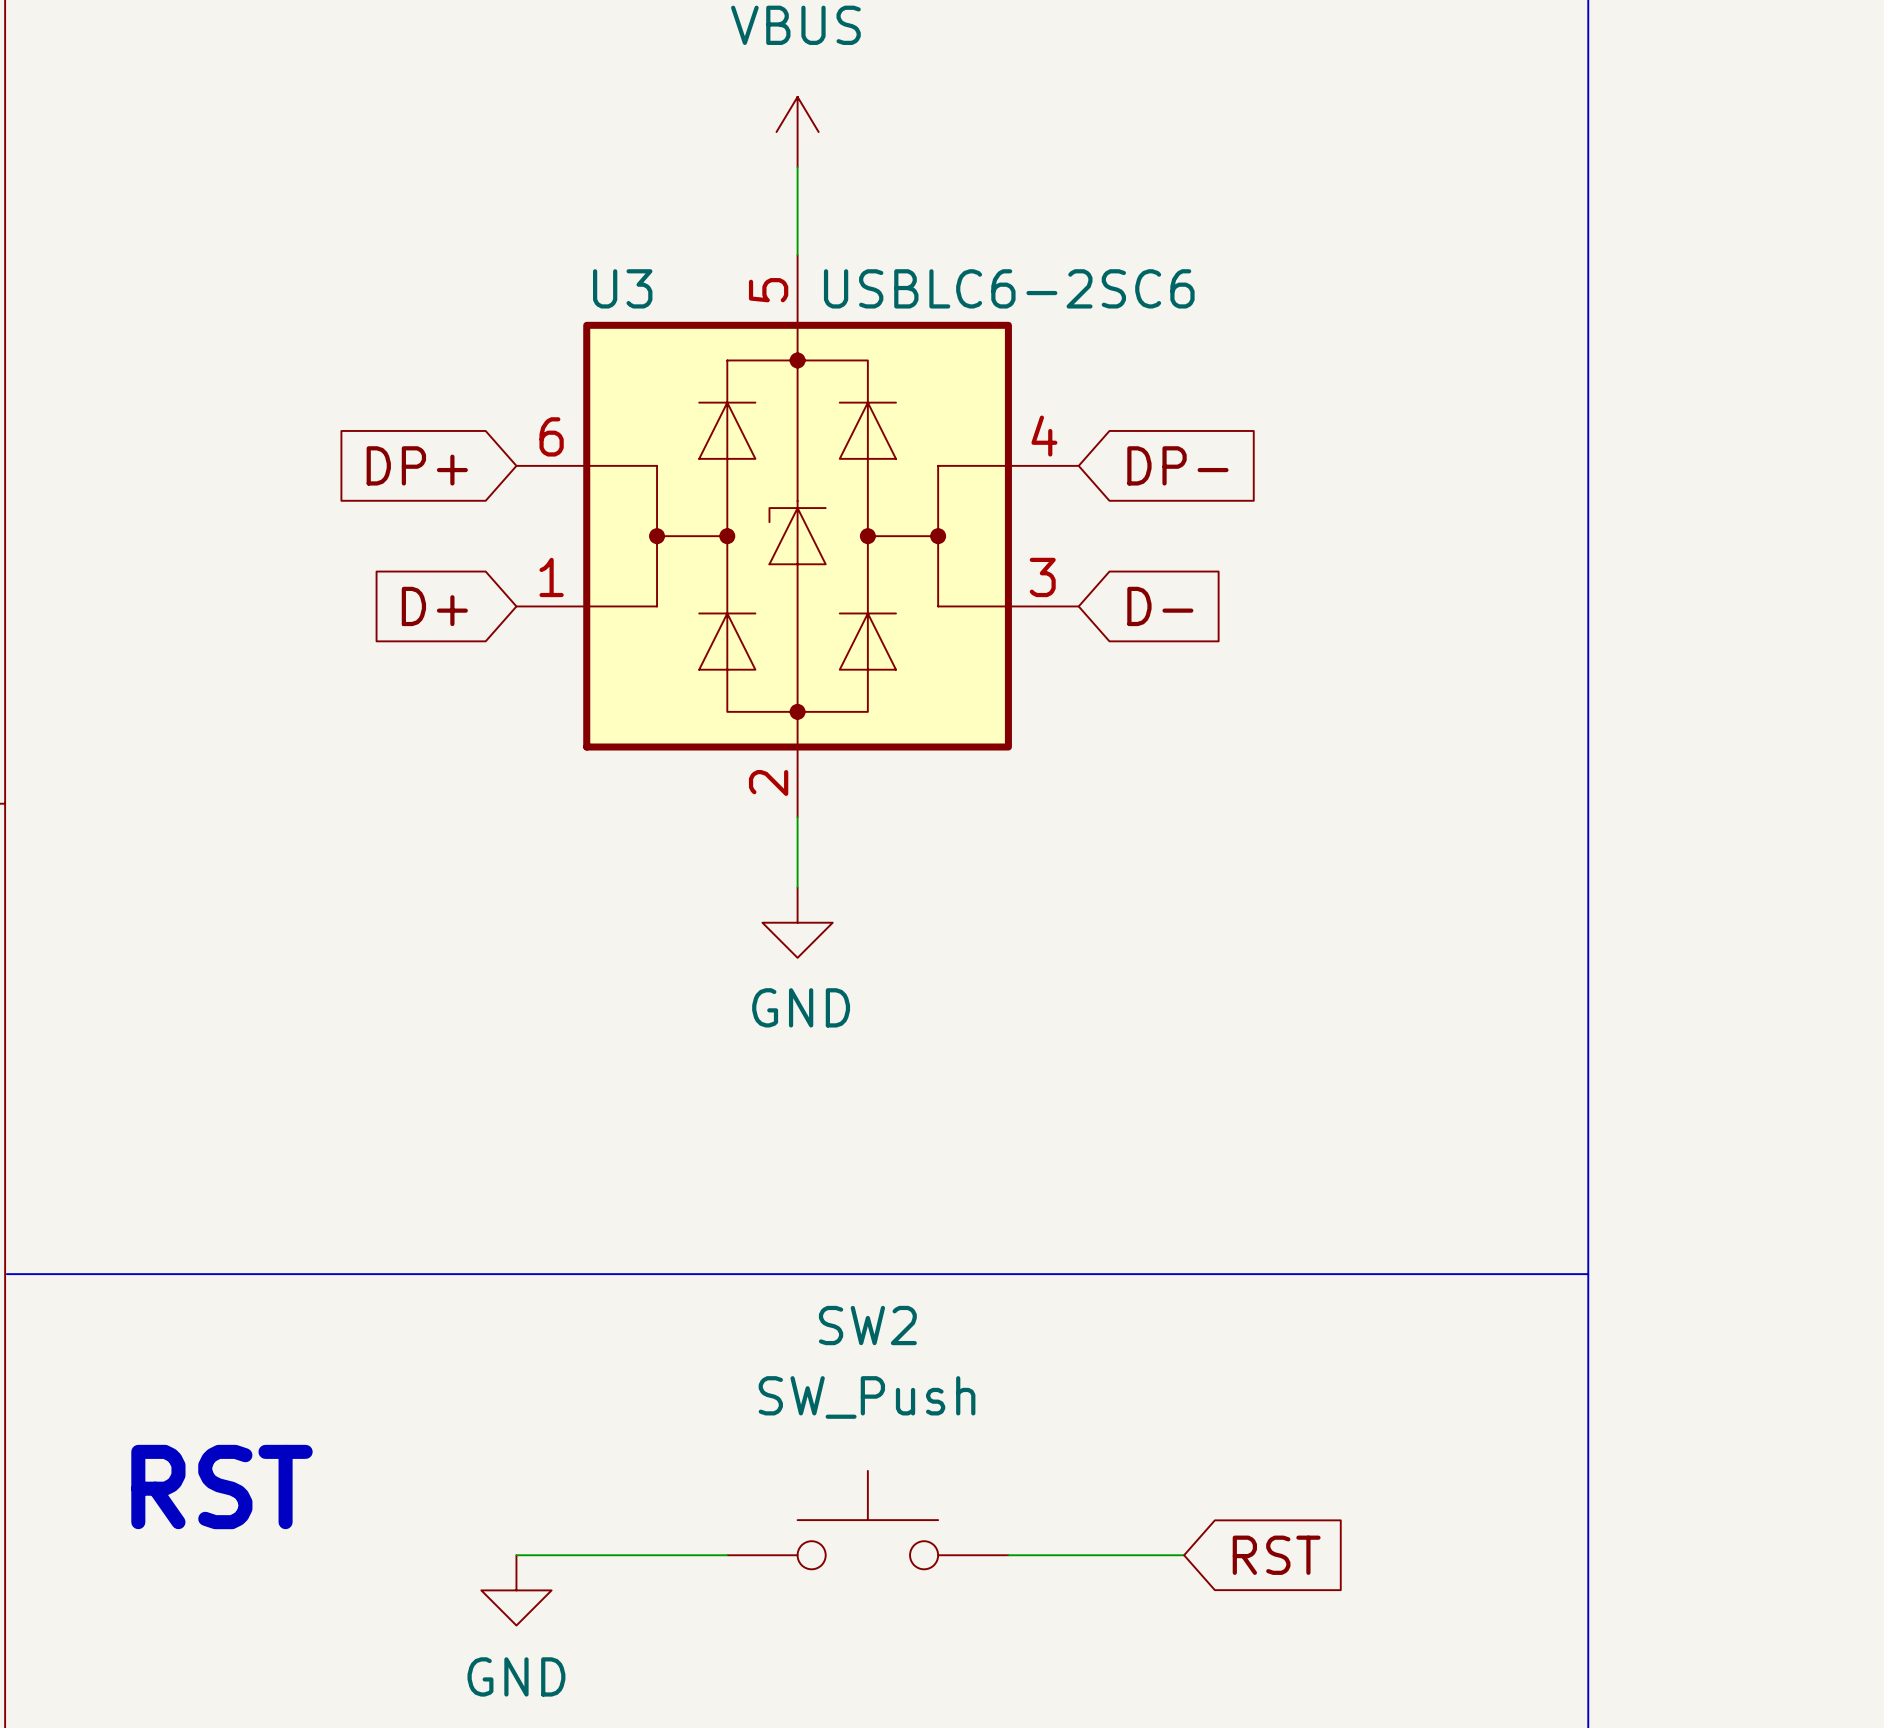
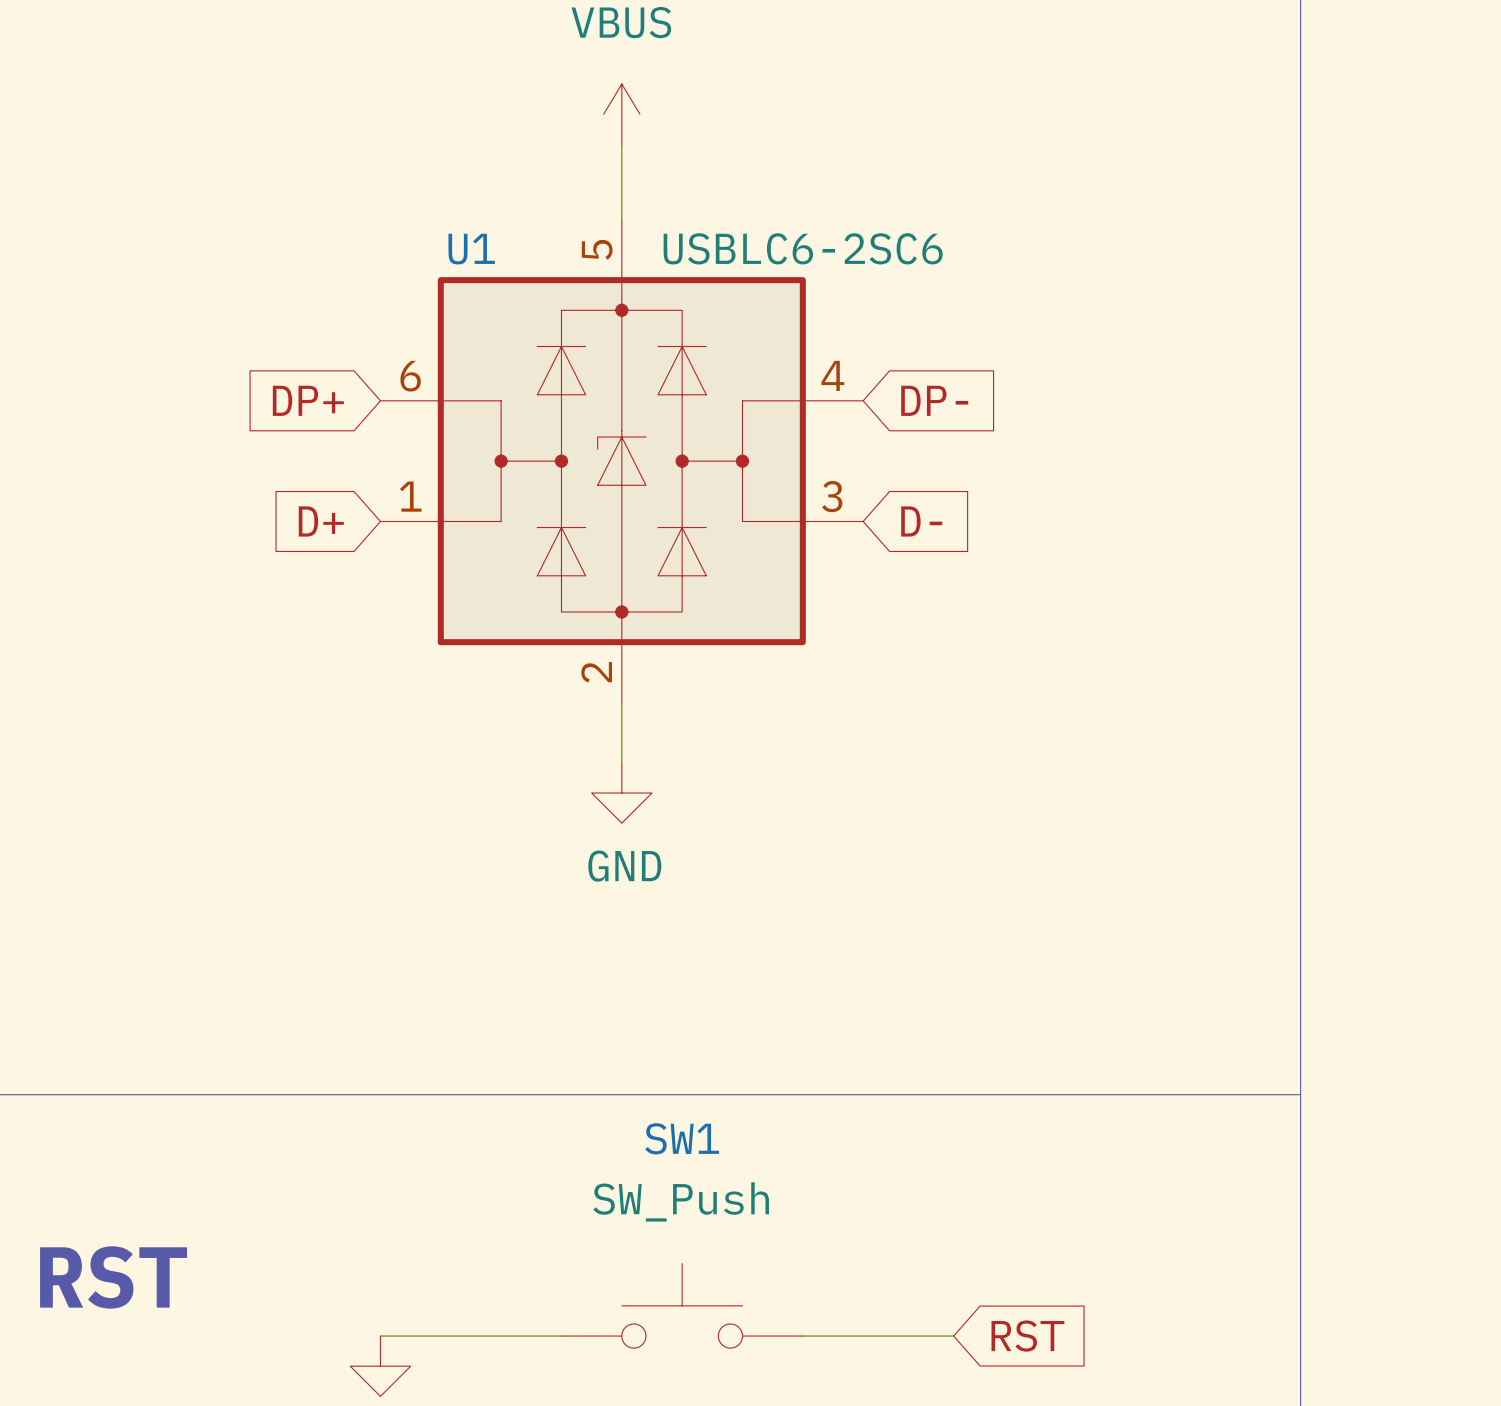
U3 name: U3 (622, 288) -> U1 (471, 249)
SW2 name: SW2 (867, 1325) -> SW1 (682, 1138)

